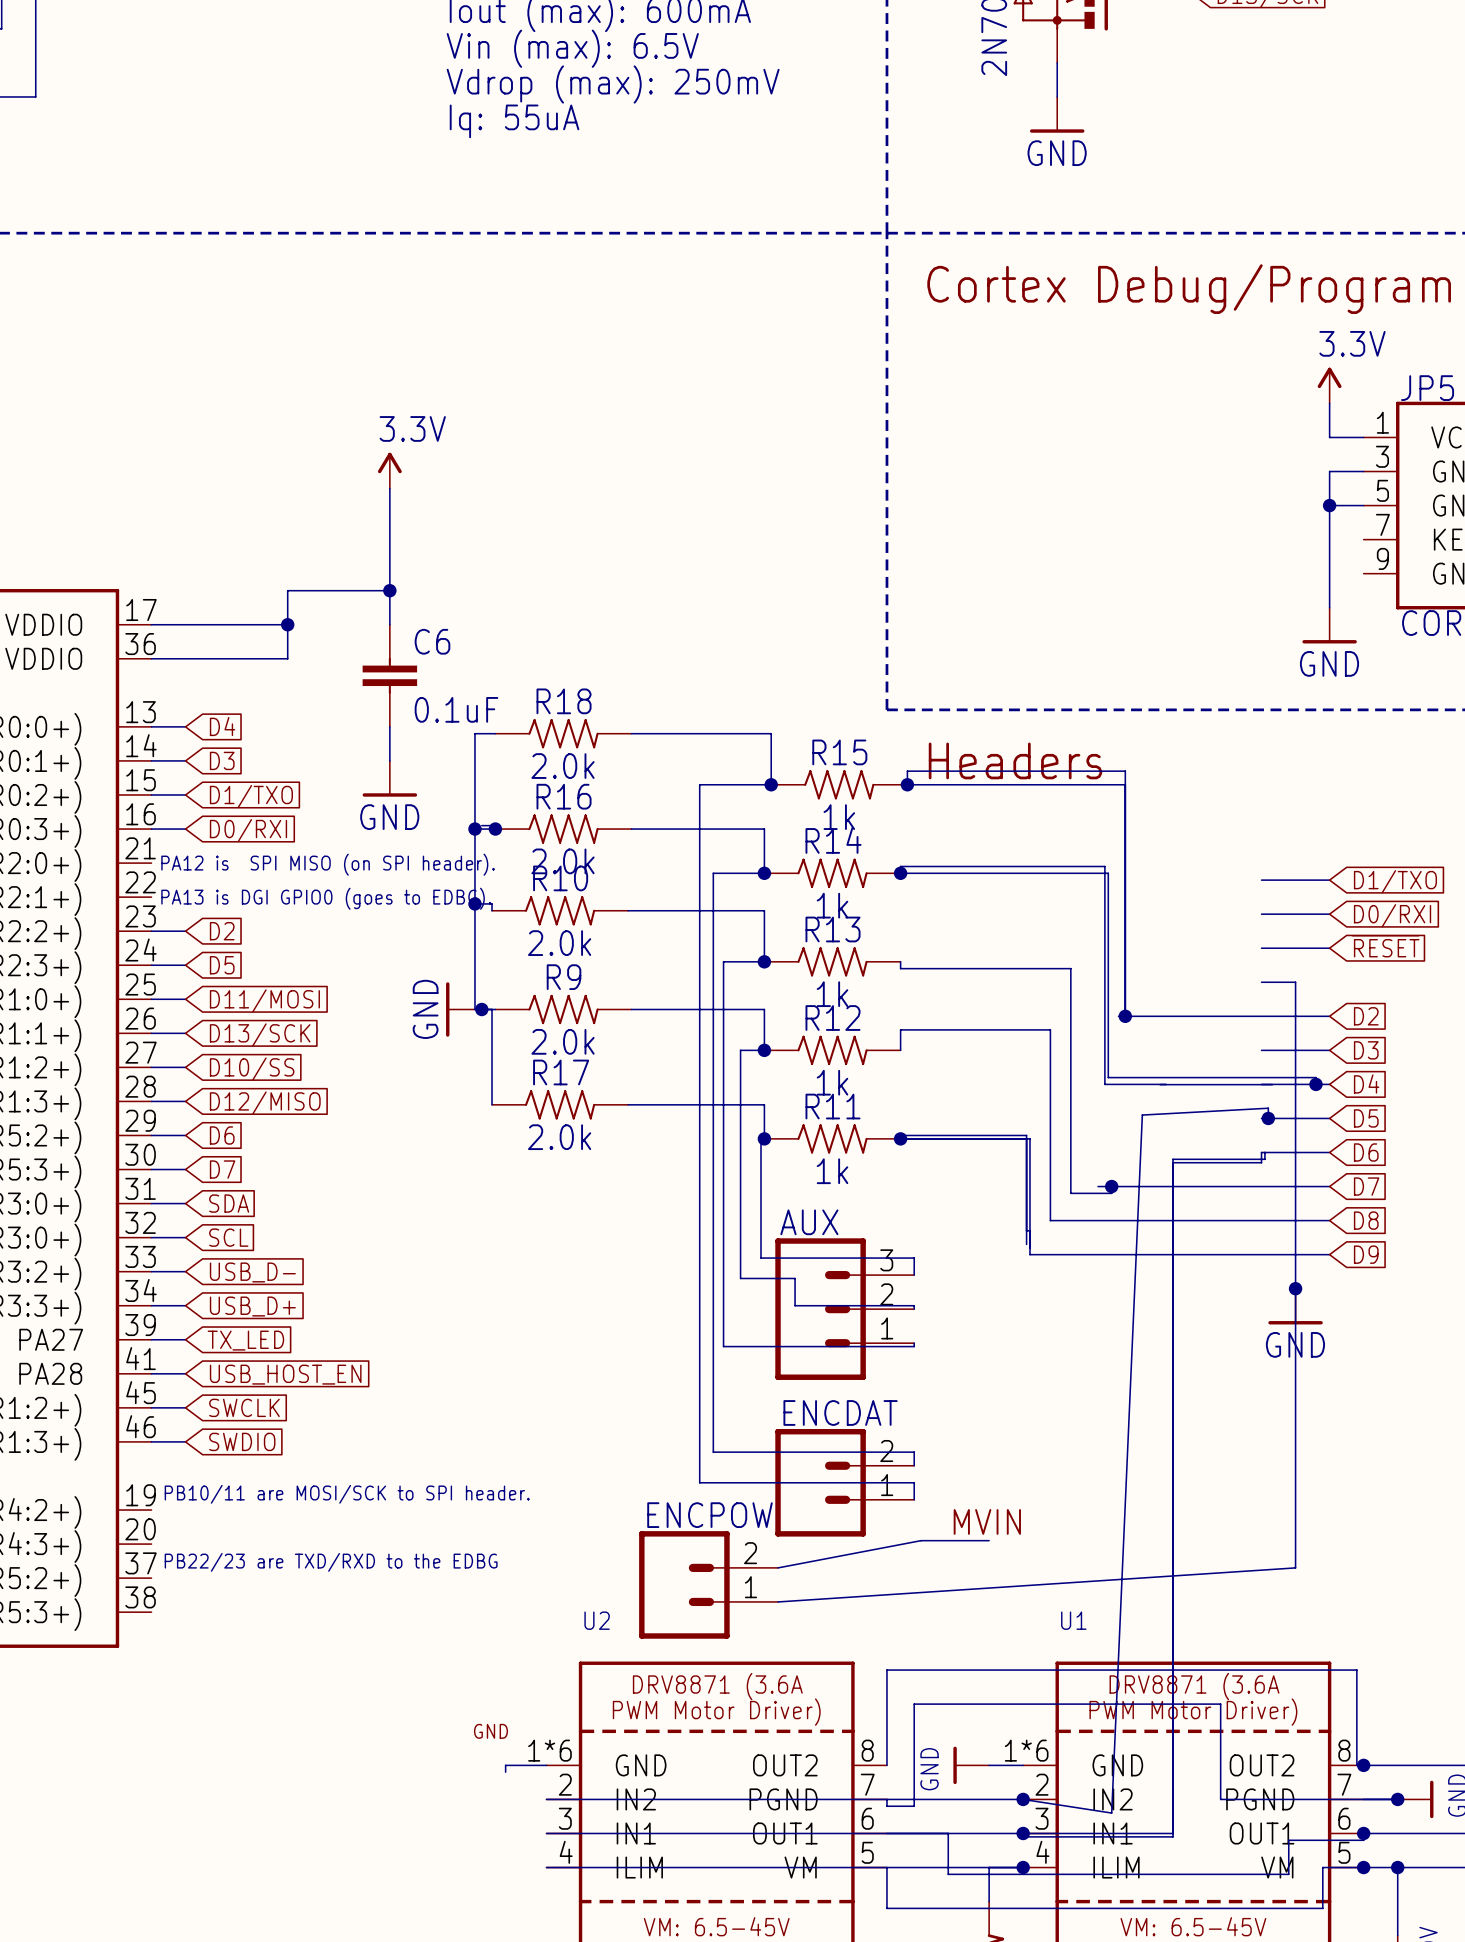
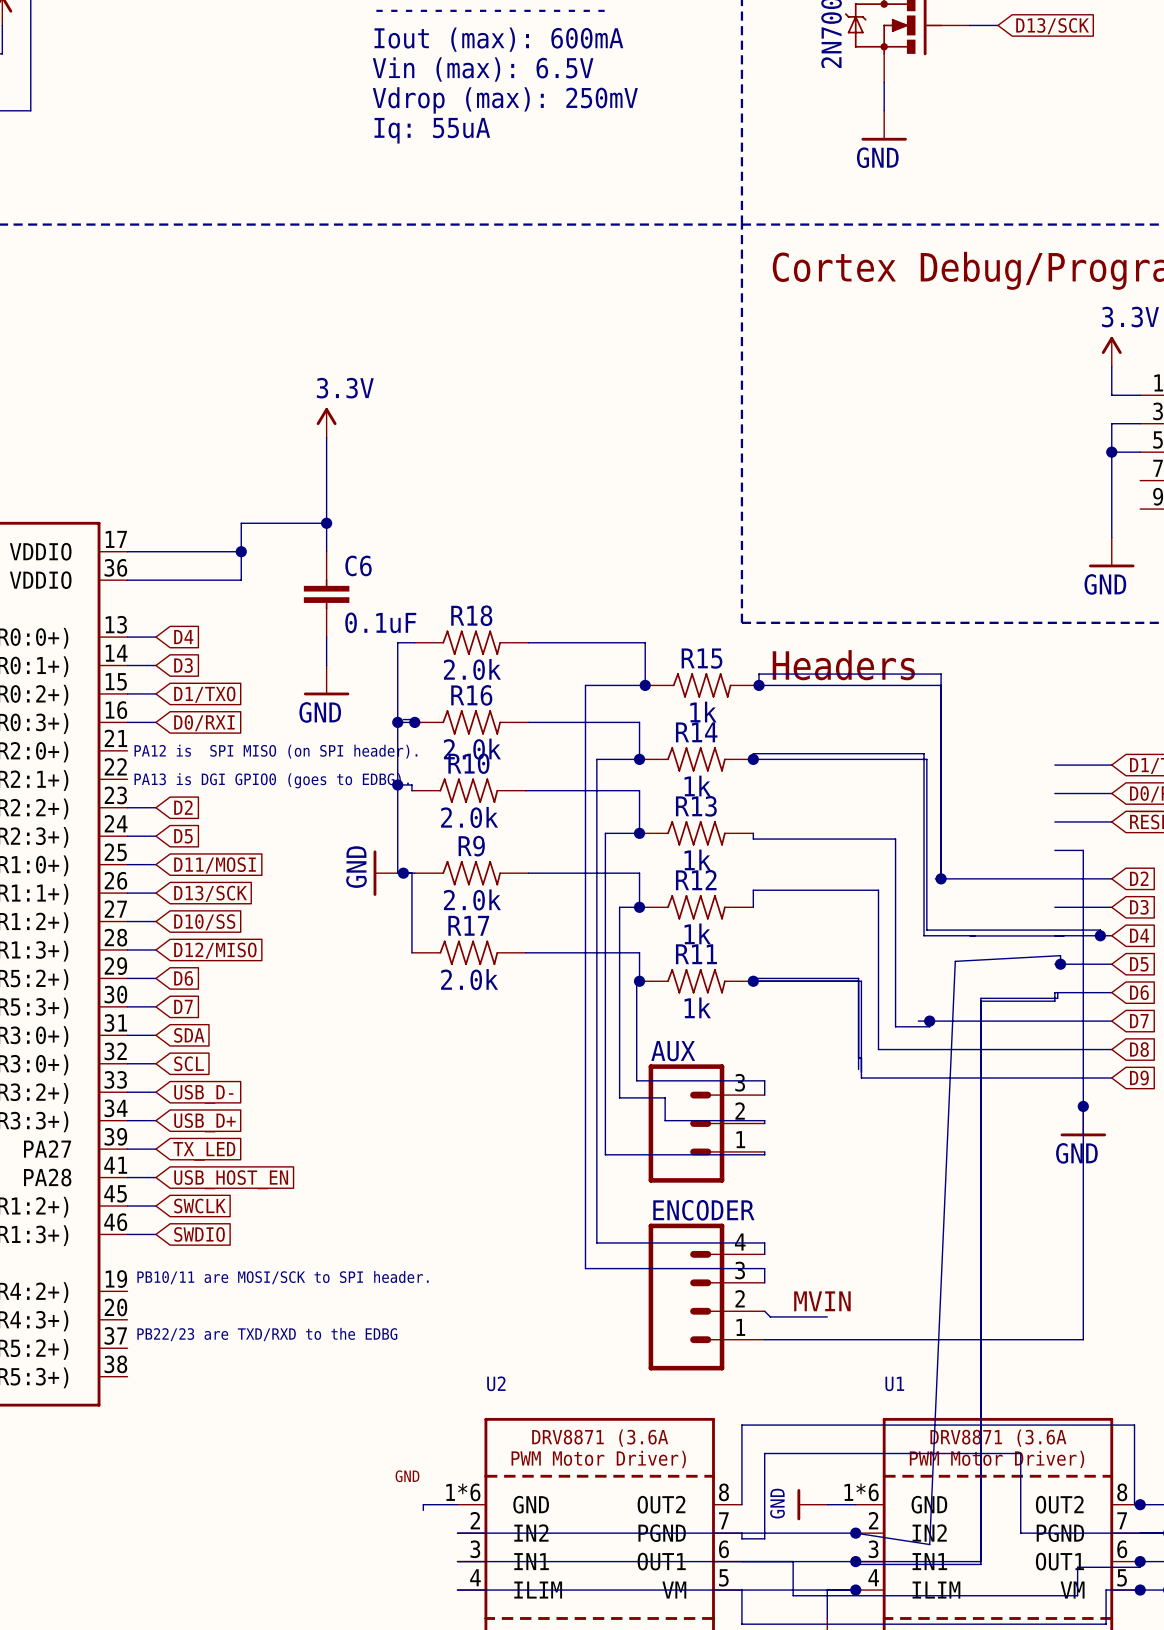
ENCDAT: (844, 1482) -> none
ENCODER: none -> (706, 1297)
wire: (921, 1540) (778, 1567) -> (770, 1316) (764, 1311)
wire: (1295, 1567) (778, 1601) -> (1083, 1339) (764, 1339)
ENCPOW: (708, 1584) -> none

